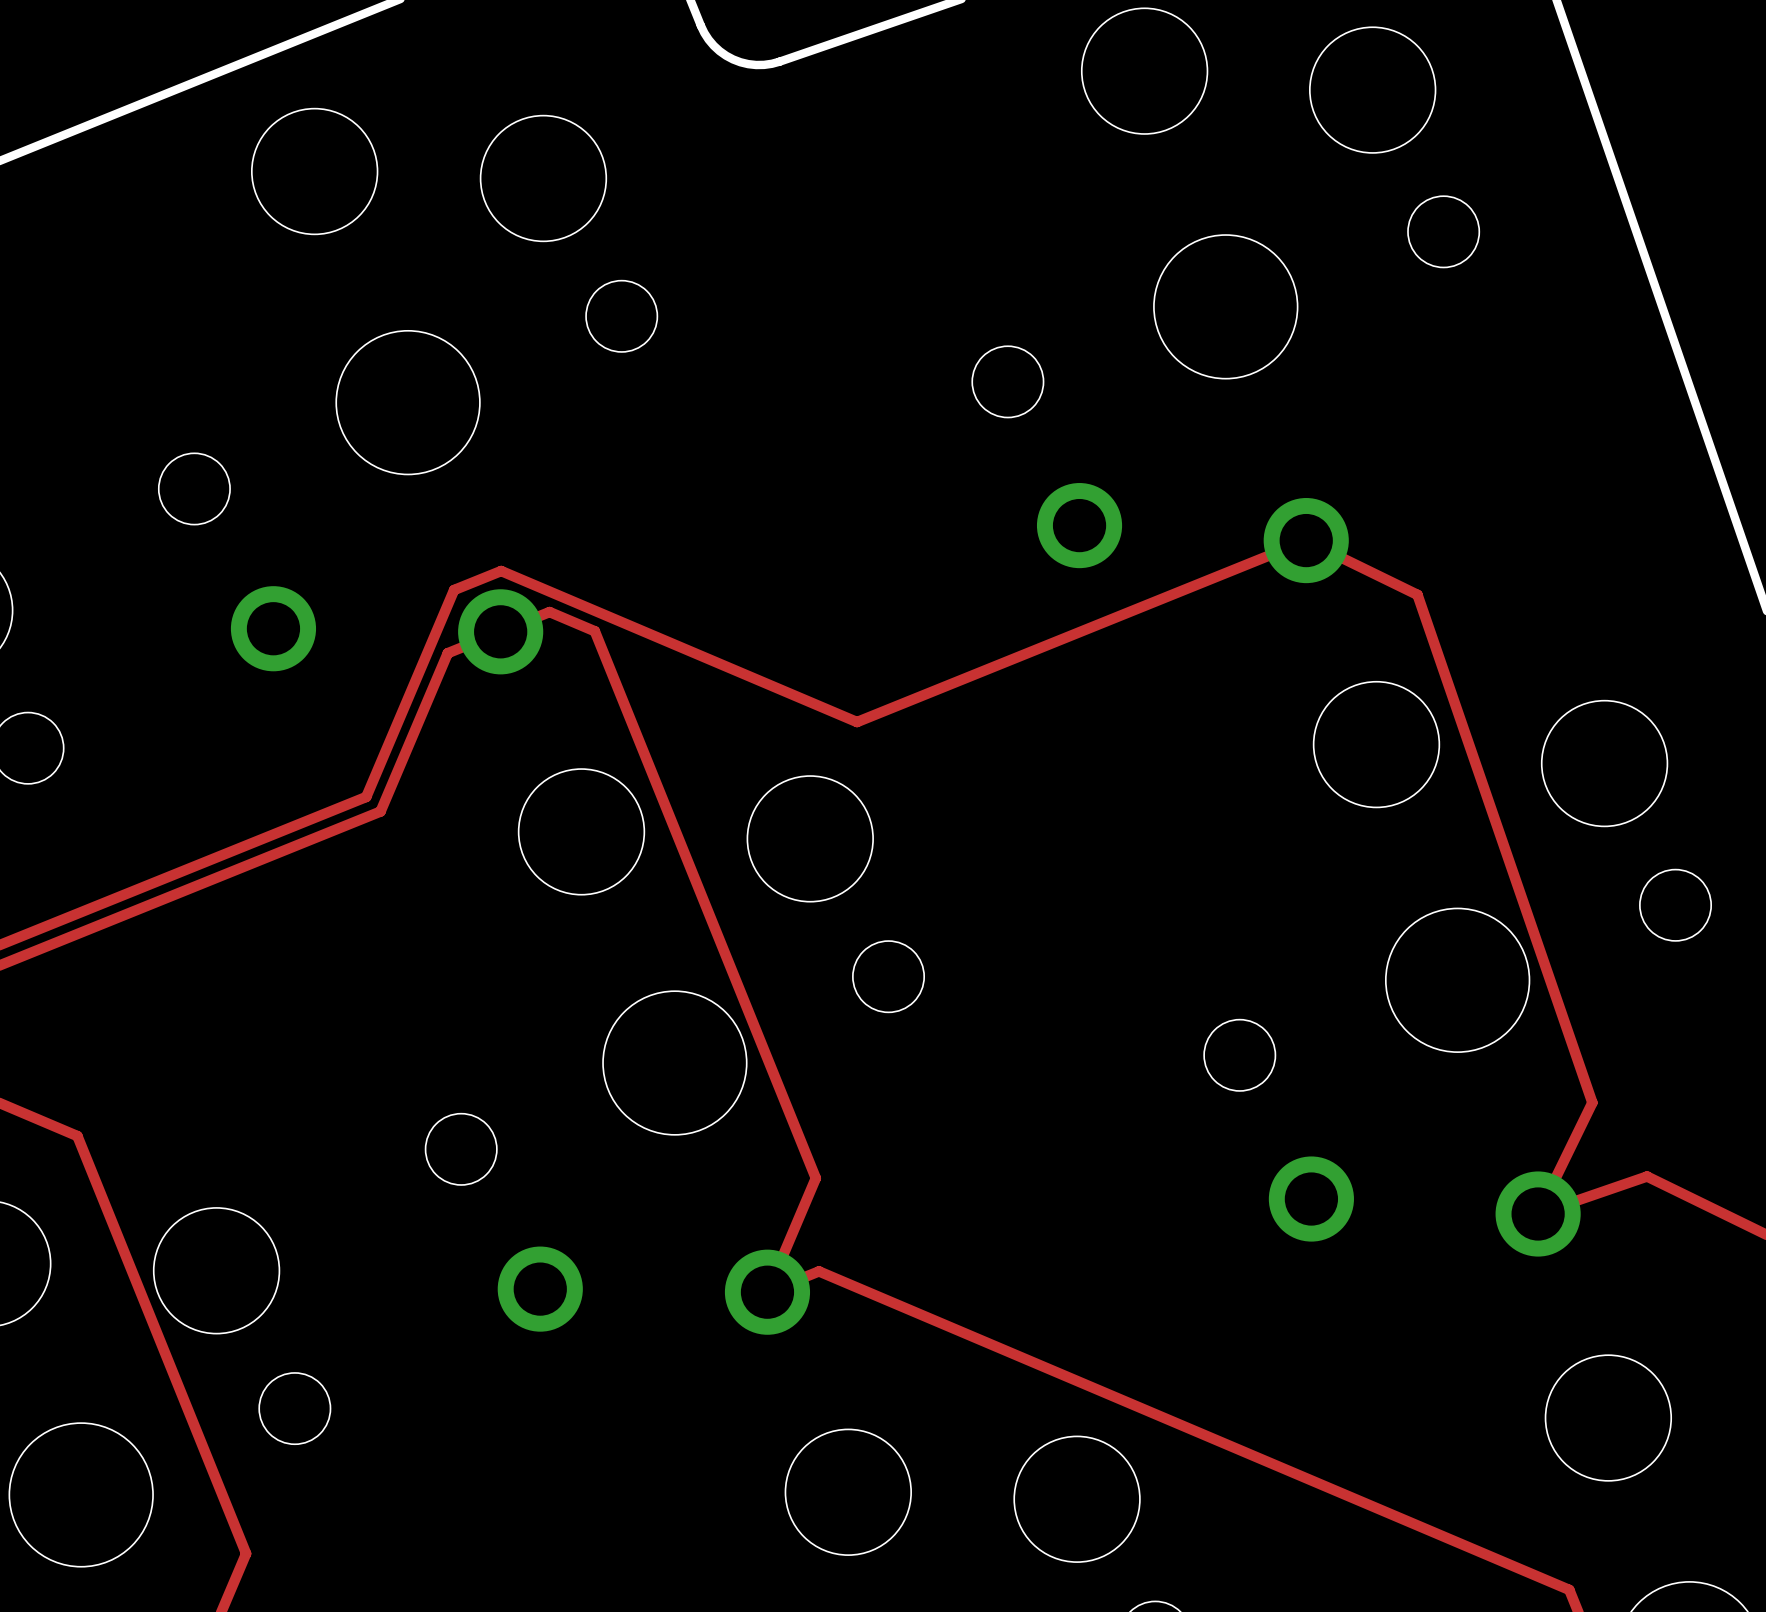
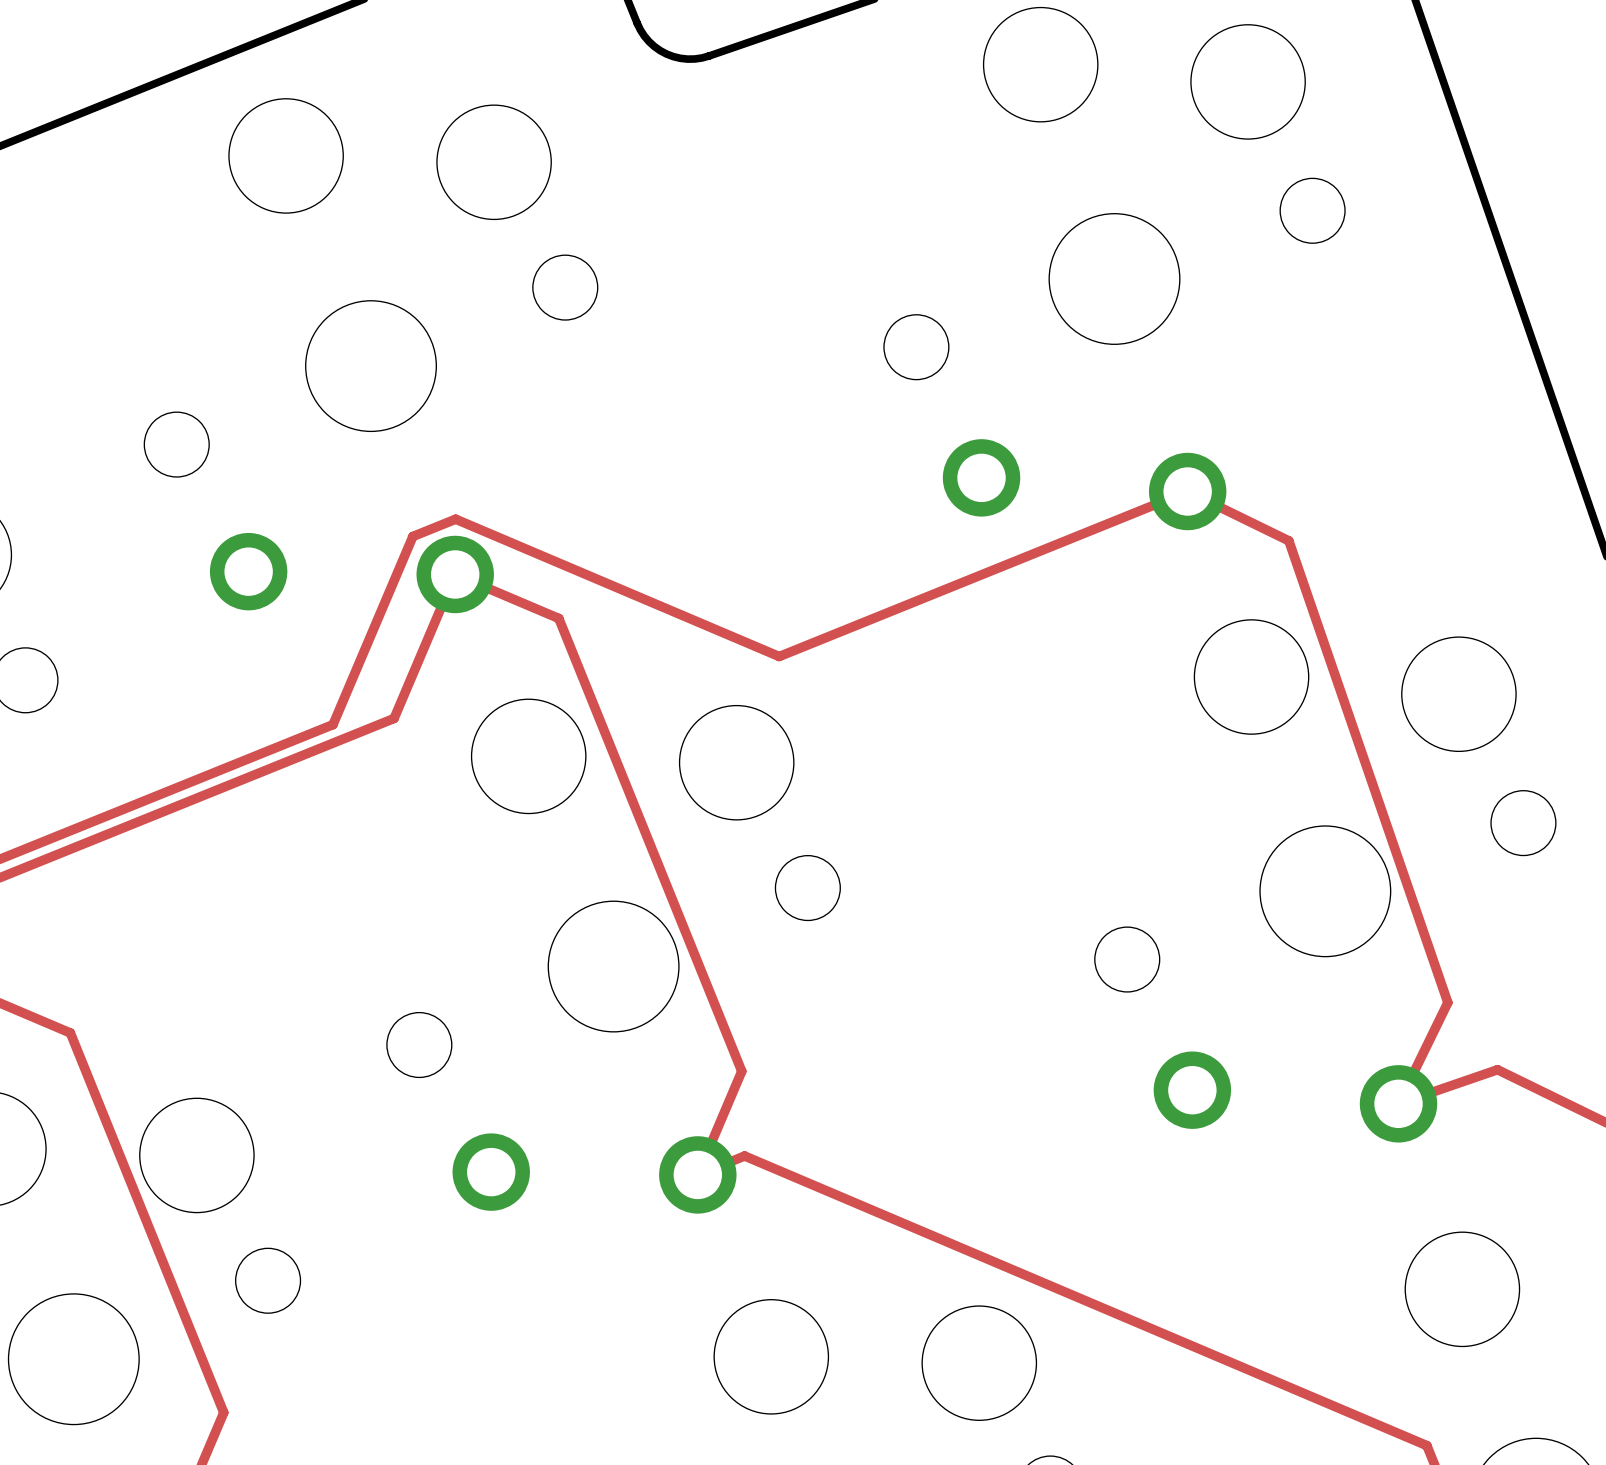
track: (614, 680) (594, 631) (549, 612) (447, 653) (380, 811) -> (558, 618) (455, 574) (394, 718) (346, 737)

